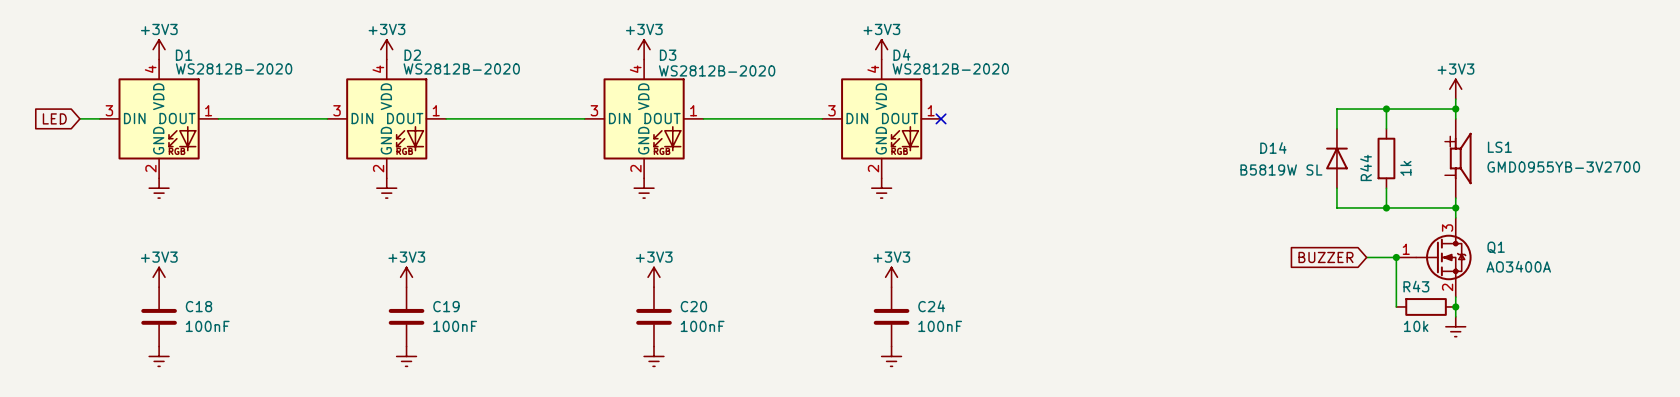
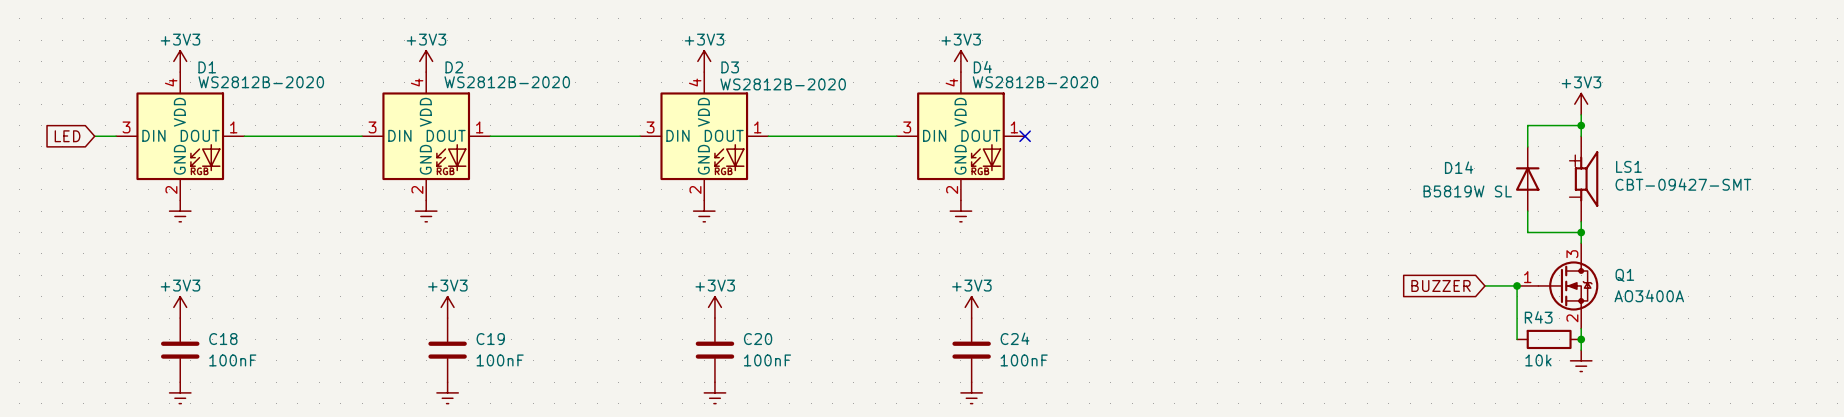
wire: (1386, 109) (1386, 128) -> none
junction: (1386, 109) -> none
wire: (1406, 109) (1336, 109) (1336, 128) -> (1527, 125) (1527, 146)
D14 position: (1336, 158) -> (1527, 179)
R44: 1k (1386, 158) -> none
LS1 value: GMD0955YB-3V2700 (1563, 167) -> CBT-09427-SMT (1683, 184)
wire: (1336, 188) (1336, 207) (1406, 207) -> (1527, 211) (1527, 232)
wire: (1386, 188) (1386, 207) -> none
junction: (1386, 207) -> none

